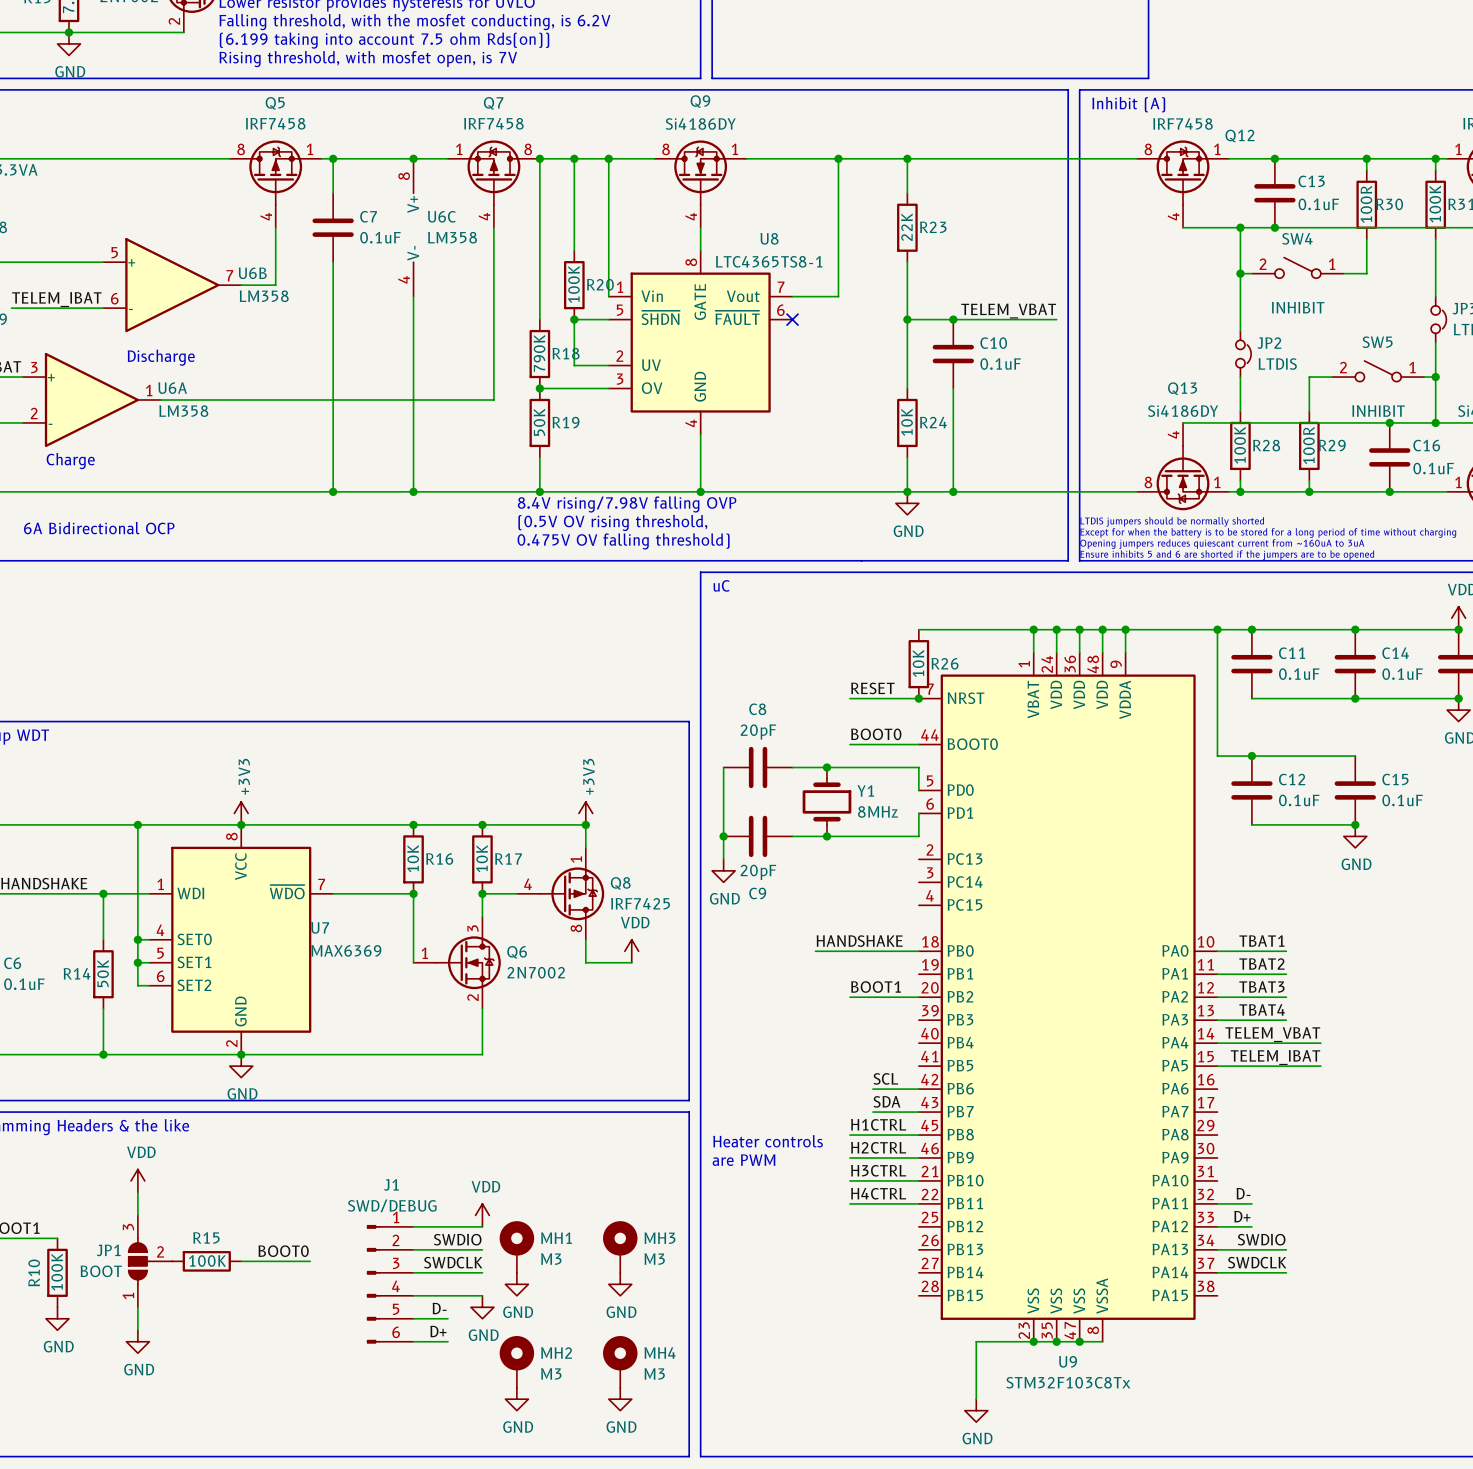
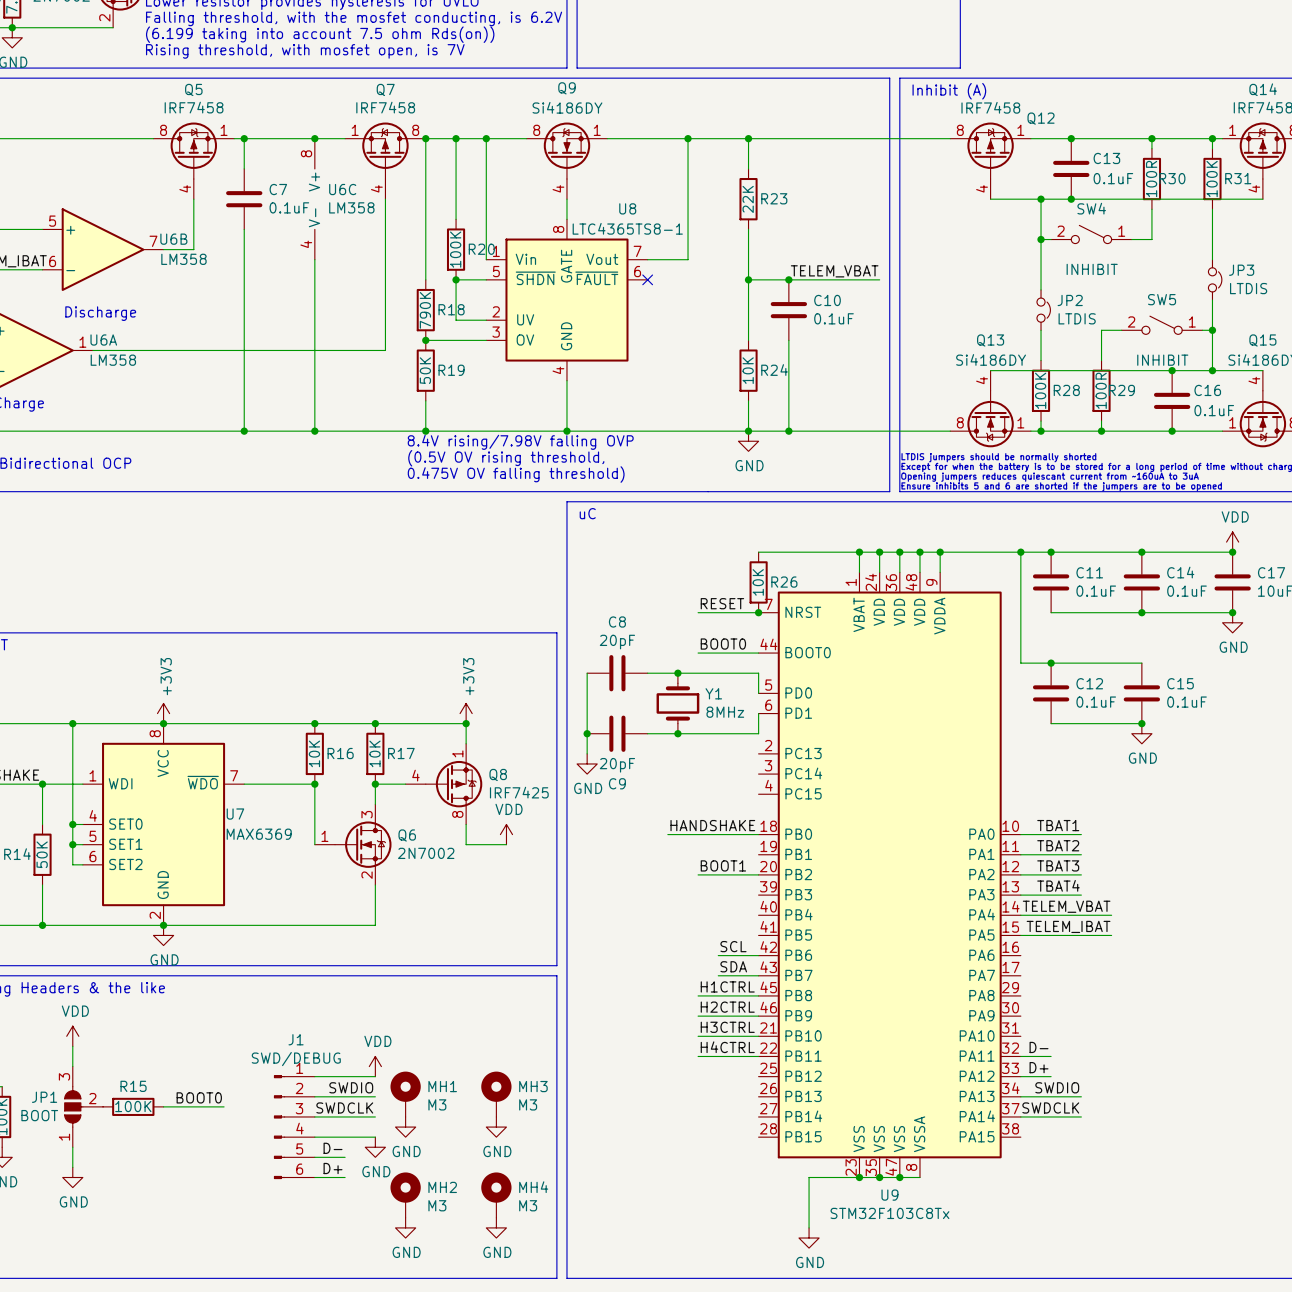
text: Heater controls (768, 1141) -> none
text: are PWM (743, 1160) -> none

